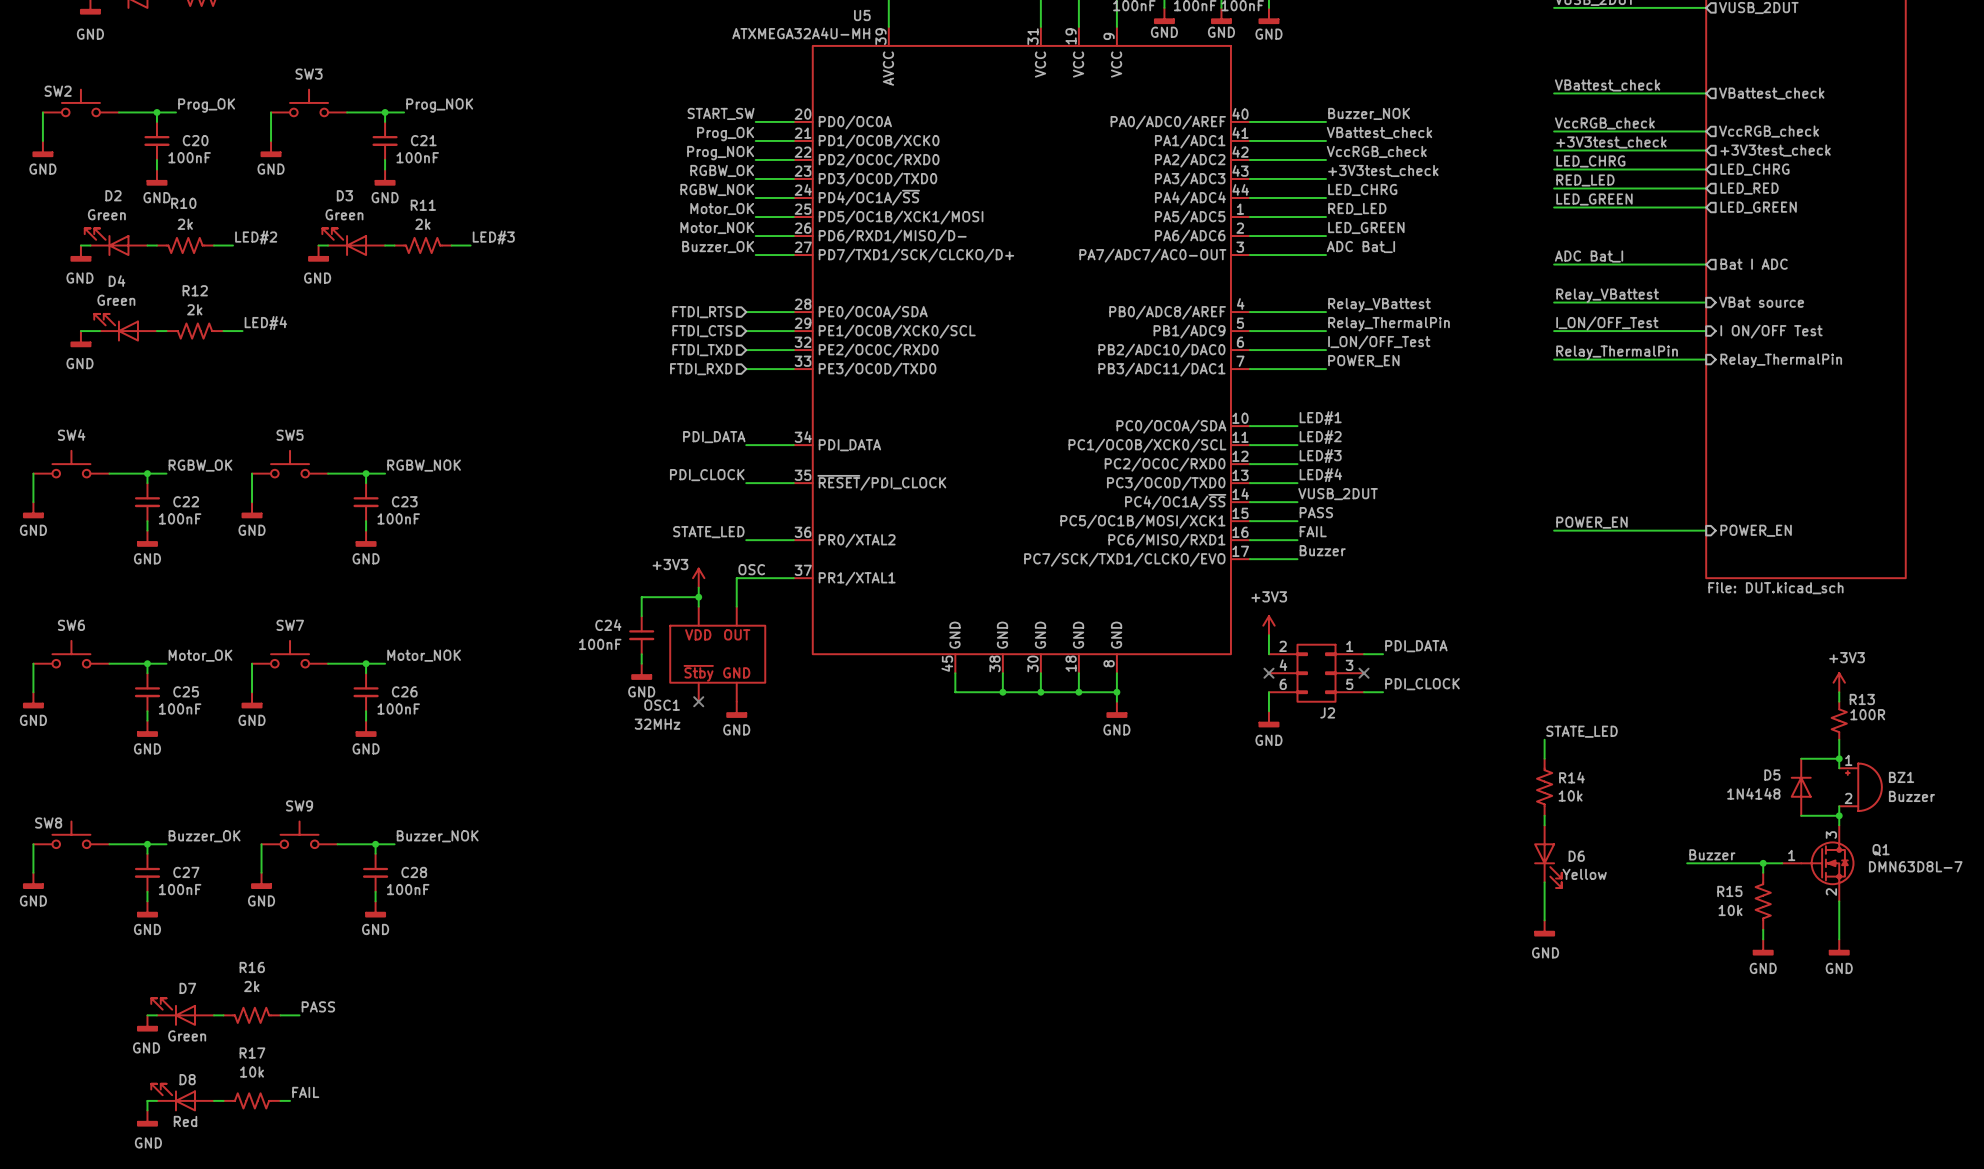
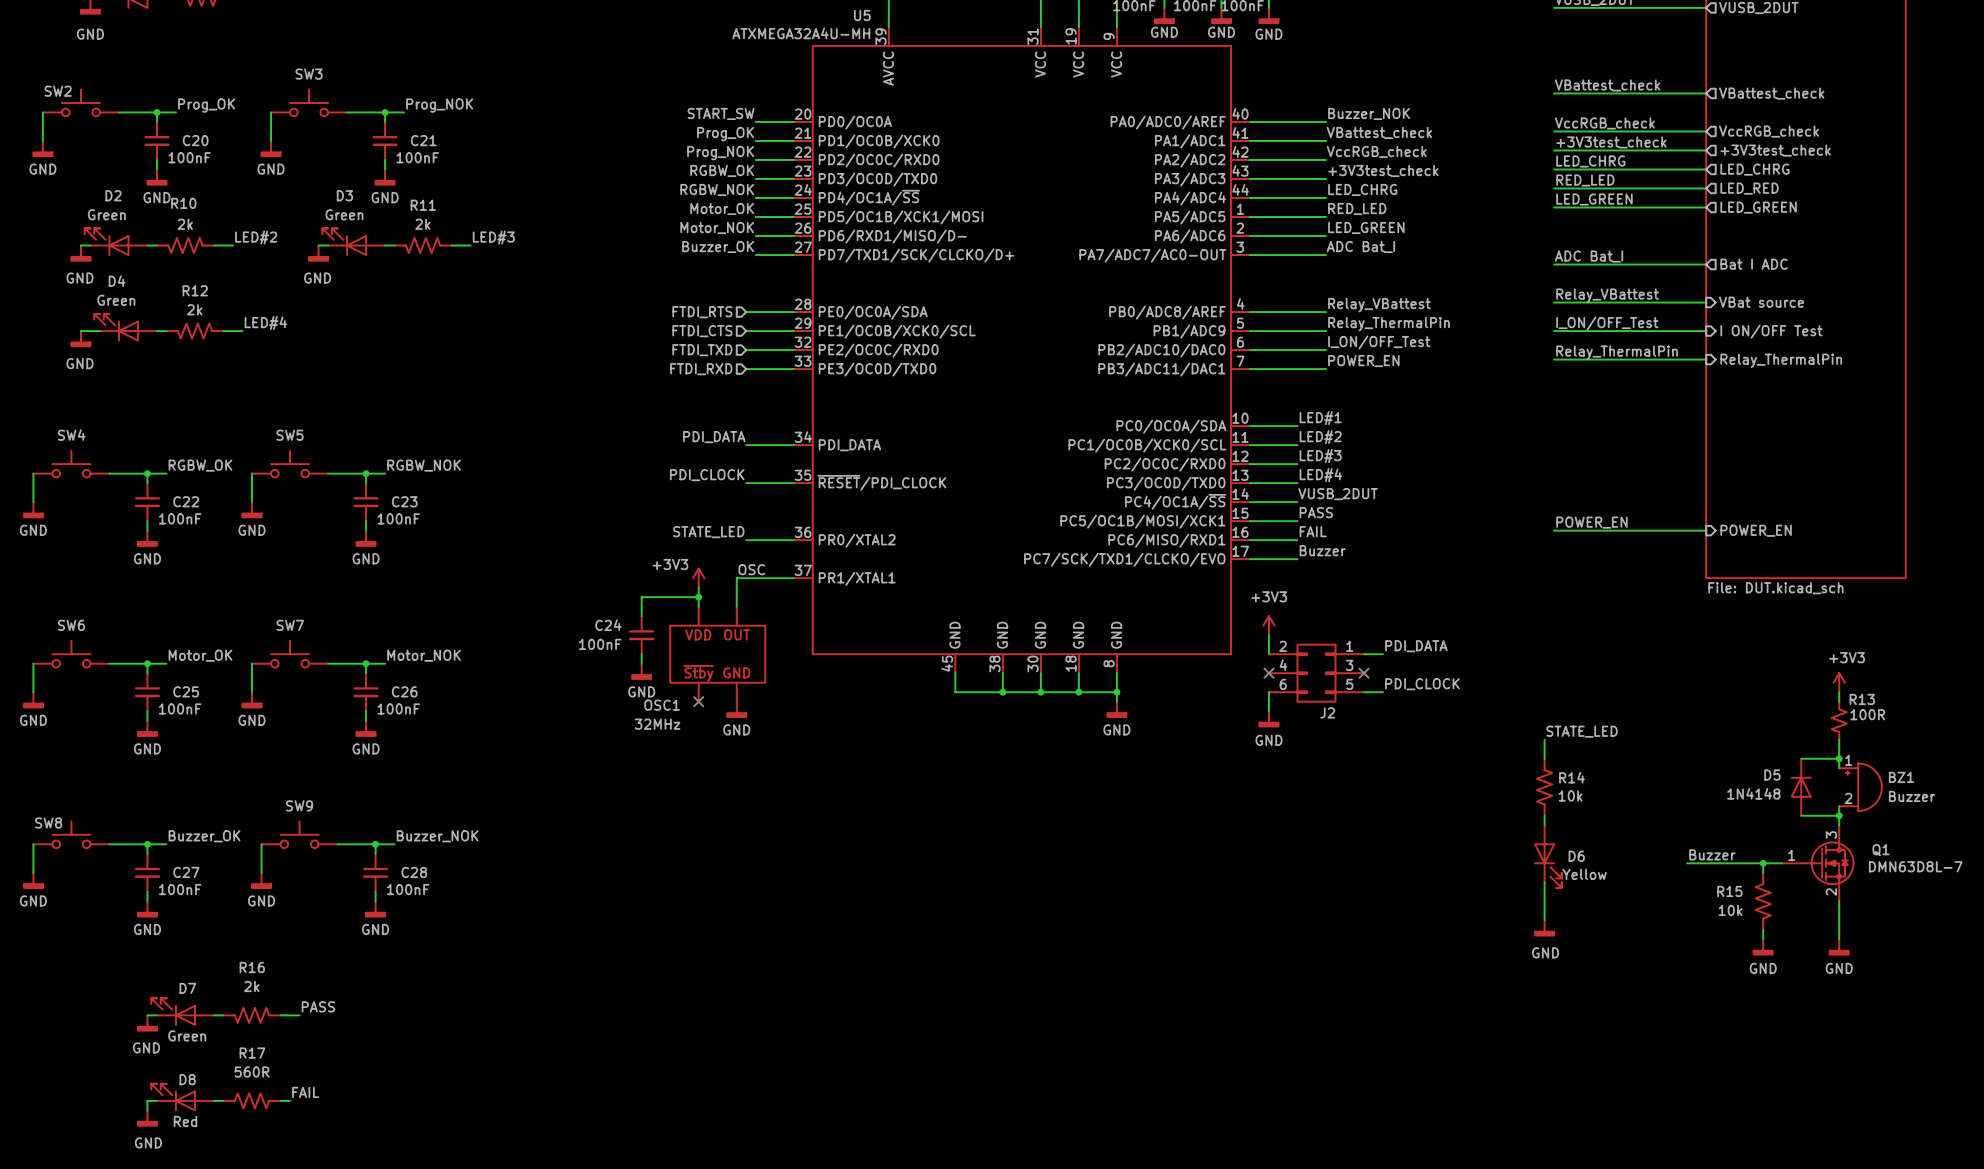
R17 value: 10k (252, 1072) -> 560R (252, 1072)

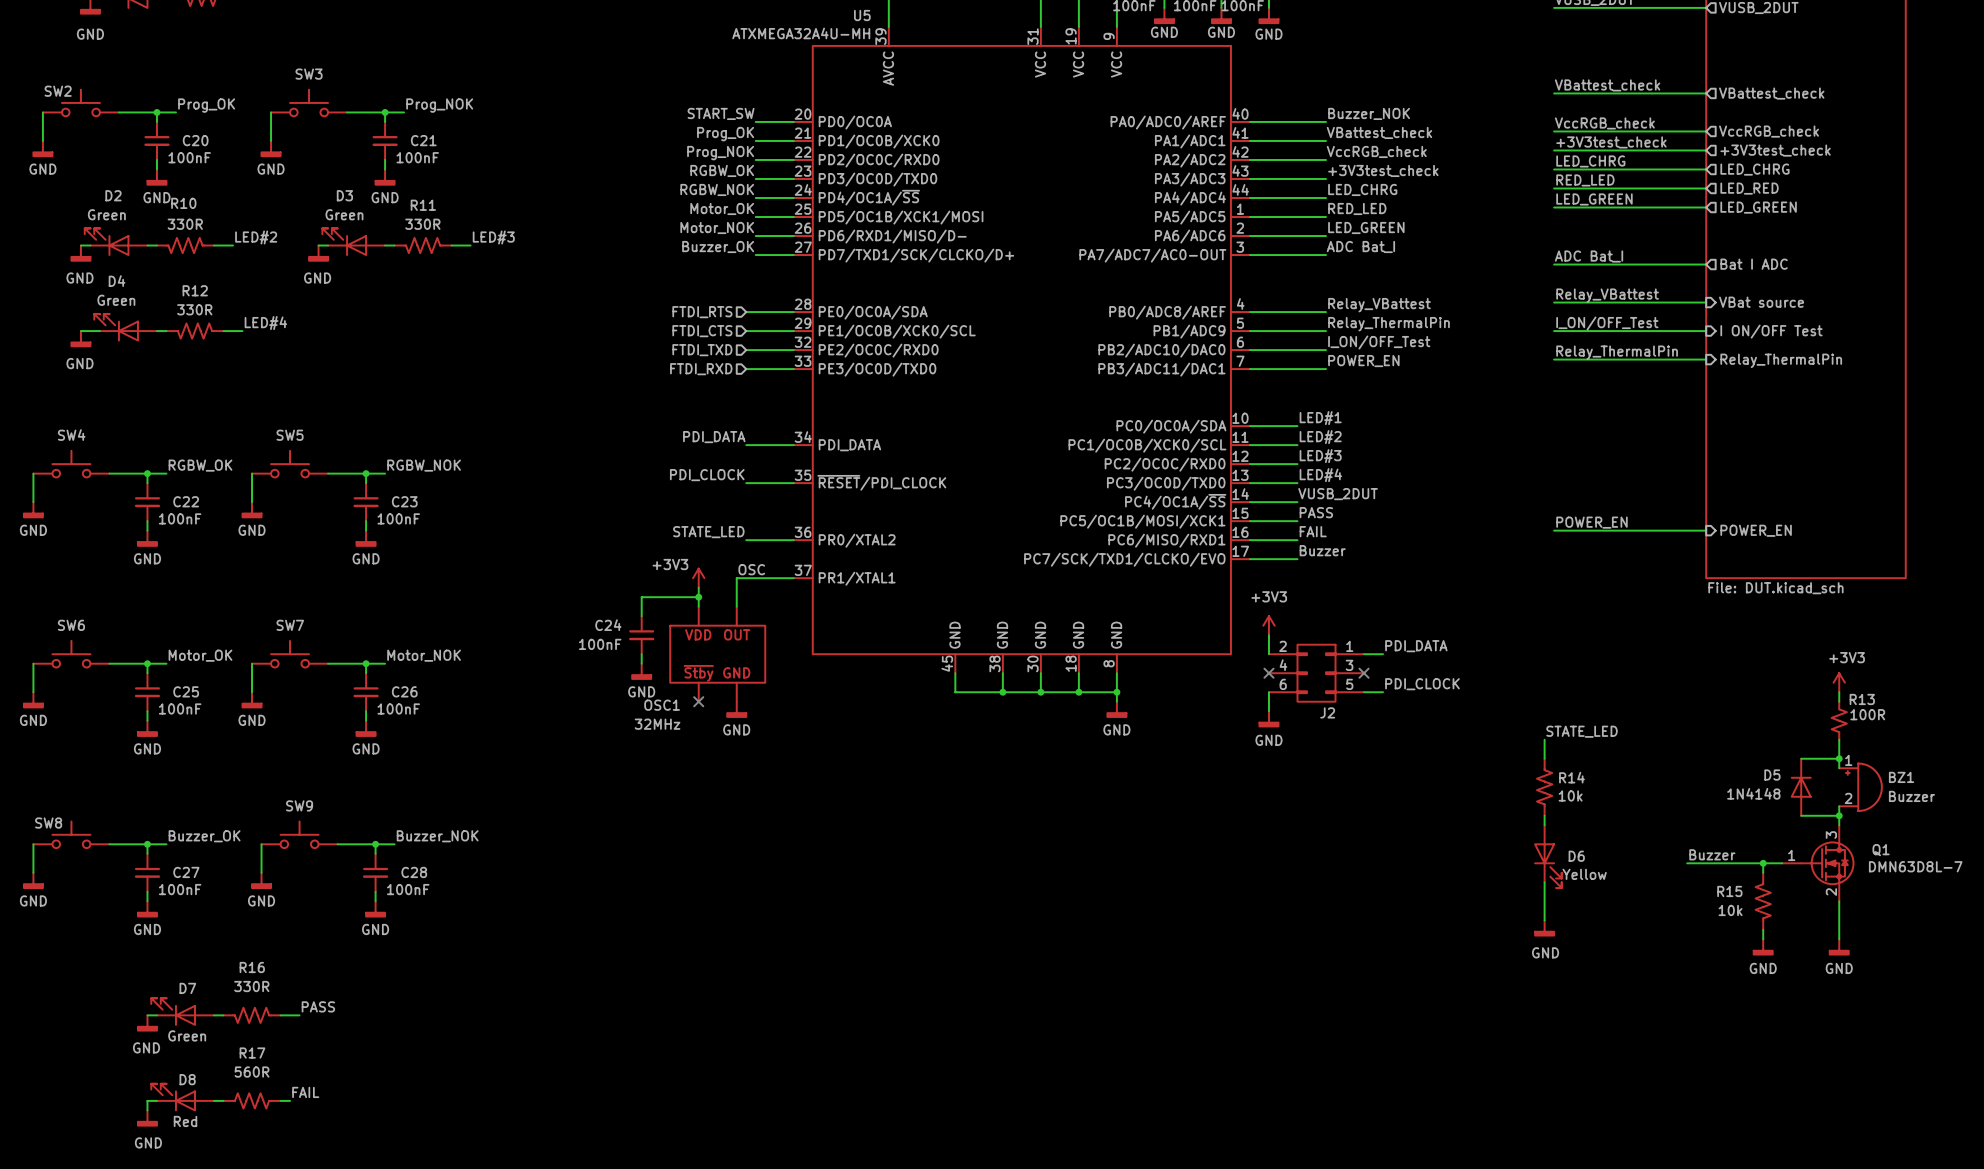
R10 value: 2k (185, 224) -> 330R (185, 224)
R11 value: 2k (422, 224) -> 330R (422, 224)
R12 value: 2k (194, 309) -> 330R (194, 309)
R16 value: 2k (251, 986) -> 330R (251, 986)

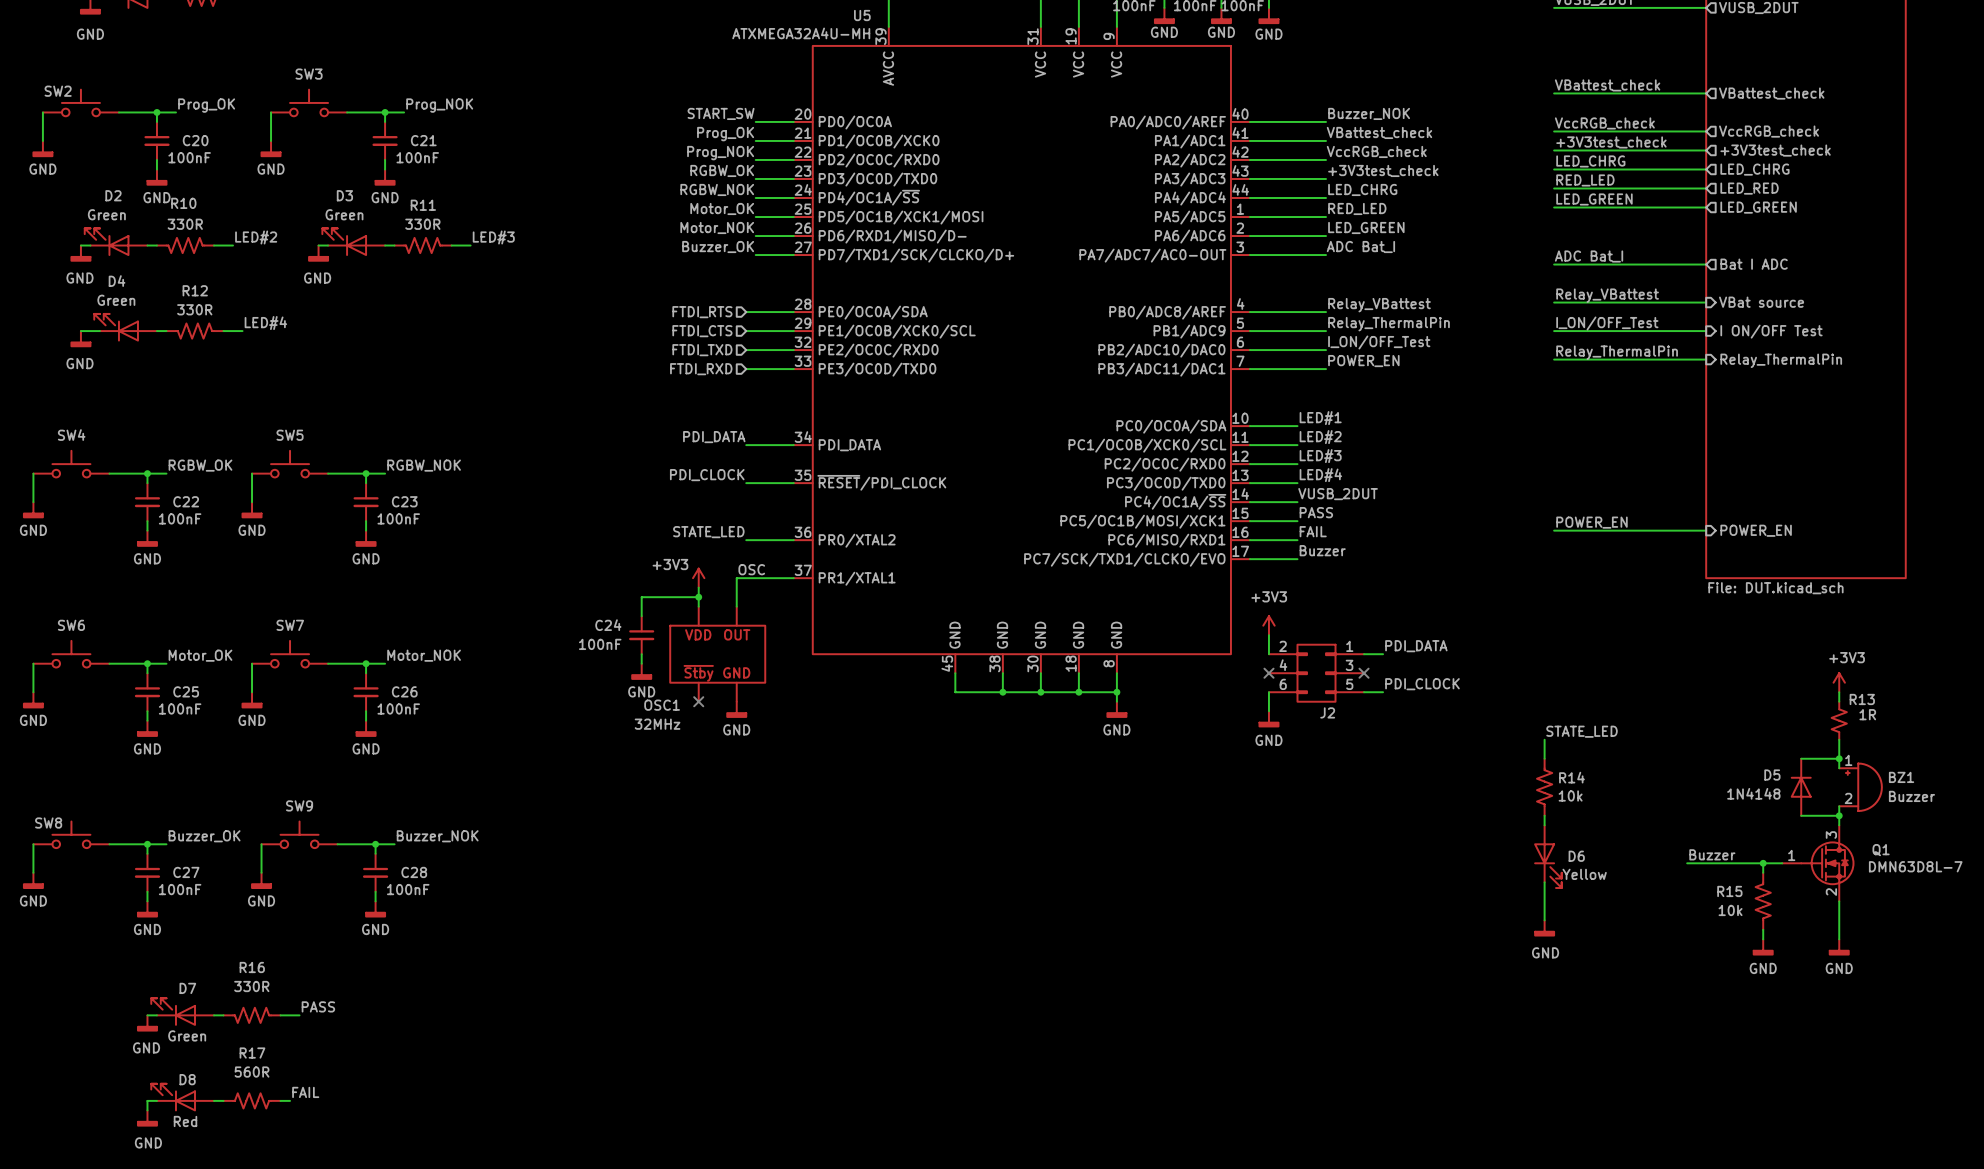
R13 value: 100R (1867, 714) -> 1R (1867, 714)

